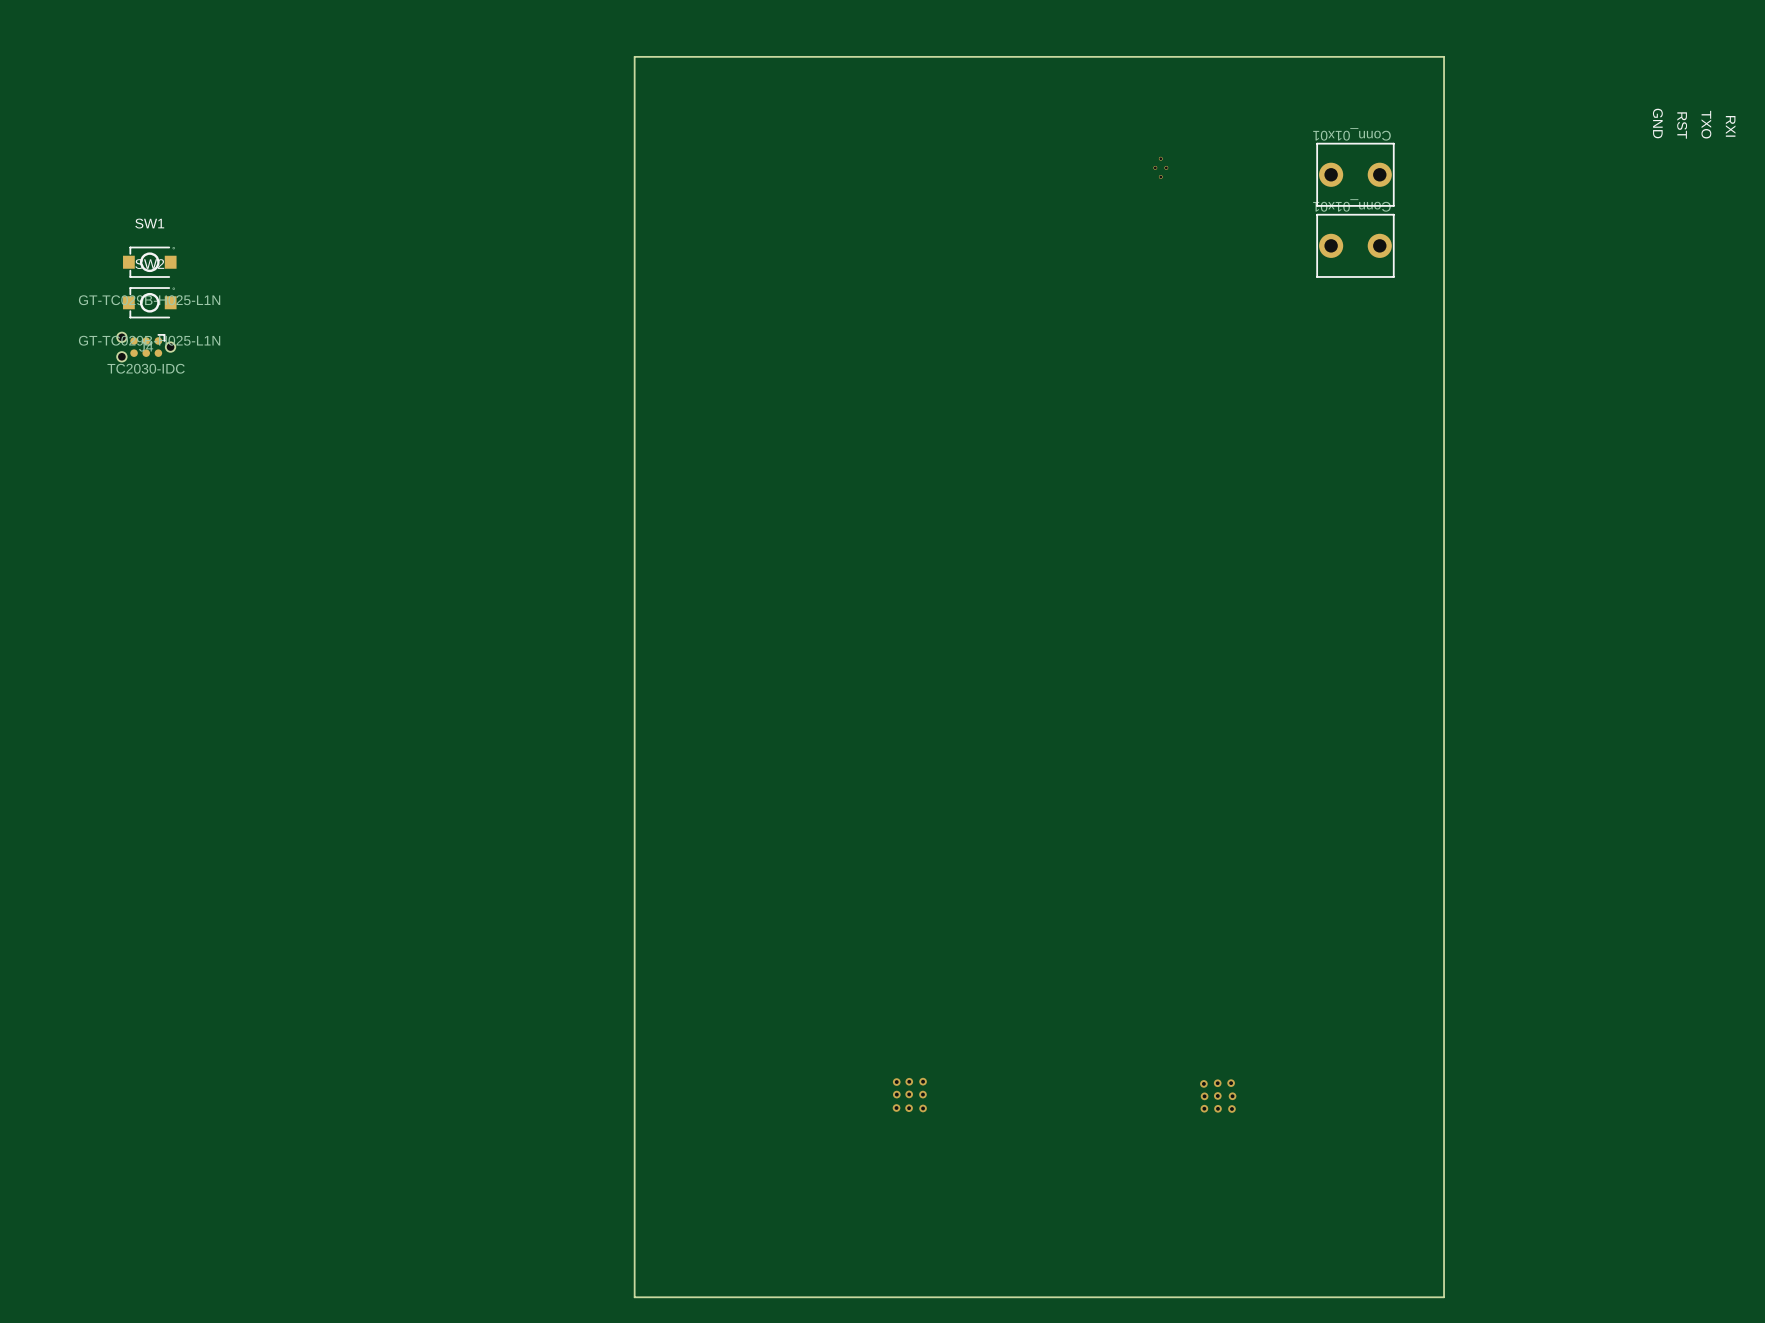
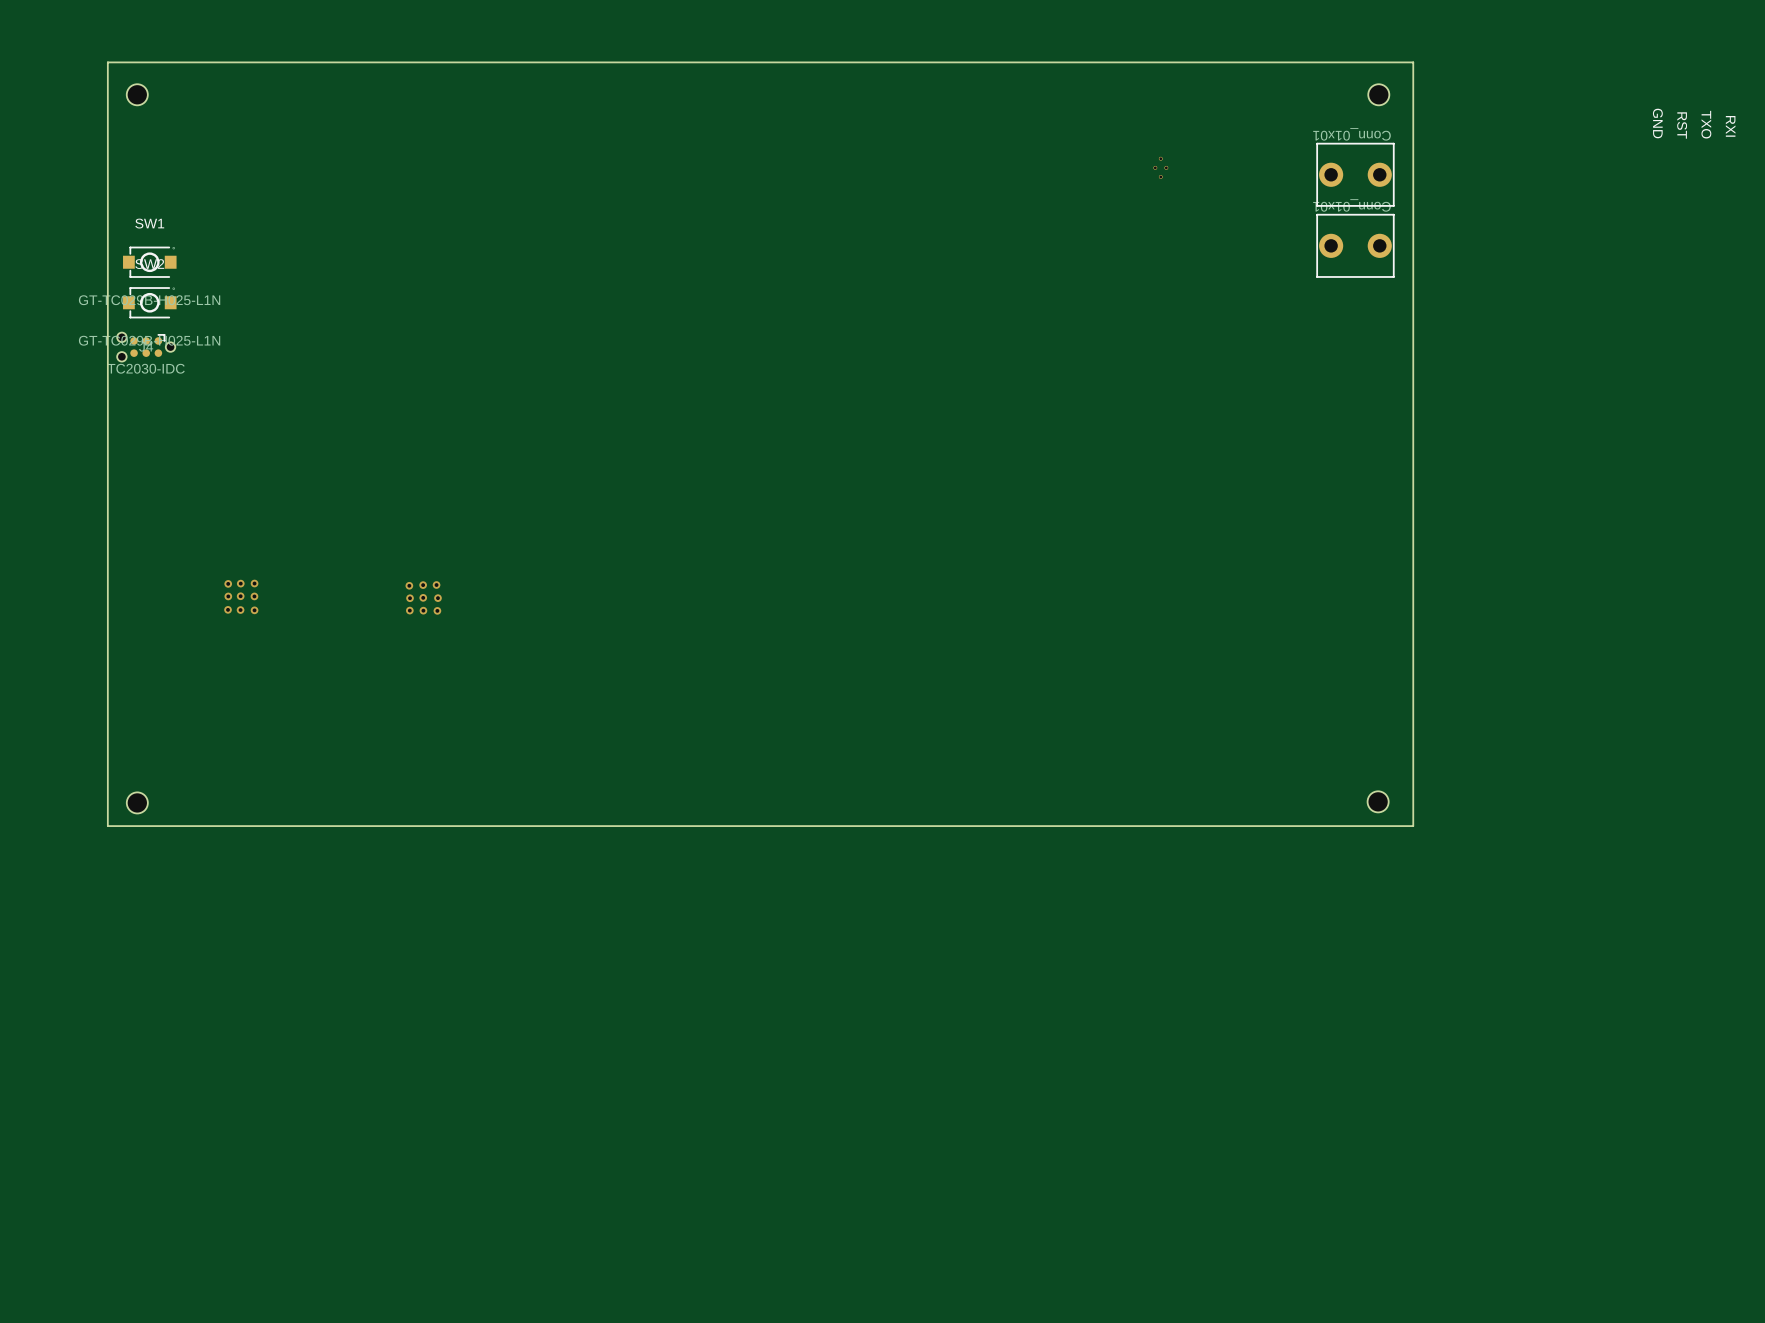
board edge: (1444, 56) (634, 56) (634, 1297) (1444, 1297) (1444, 56) -> none
board edge: none -> (1413, 62) (107, 62) (107, 826) (1413, 826) (1413, 62)
part: none -> (137, 94)
part: none -> (1378, 94)
via: none -> (228, 583)
via: none -> (240, 583)
via: none -> (254, 583)
via: none -> (409, 585)
via: none -> (423, 585)
via: none -> (436, 585)
via: none -> (228, 596)
via: none -> (240, 596)
via: none -> (254, 596)
via: none -> (423, 597)
via: none -> (410, 598)
via: none -> (437, 598)
via: none -> (228, 609)
via: none -> (240, 610)
via: none -> (254, 610)
via: none -> (409, 610)
via: none -> (423, 610)
via: none -> (437, 610)
part: none -> (1378, 801)
part: none -> (137, 802)
via: (909, 1081) -> none
via: (923, 1081) -> none
via: (896, 1082) -> none
via: (1203, 1083) -> none
via: (1217, 1083) -> none
via: (1231, 1083) -> none
via: (896, 1094) -> none
via: (909, 1094) -> none
via: (922, 1094) -> none
via: (1217, 1095) -> none
via: (1204, 1096) -> none
via: (1232, 1096) -> none
via: (896, 1108) -> none
via: (909, 1108) -> none
via: (923, 1108) -> none
via: (1204, 1108) -> none
via: (1217, 1108) -> none
via: (1231, 1109) -> none

